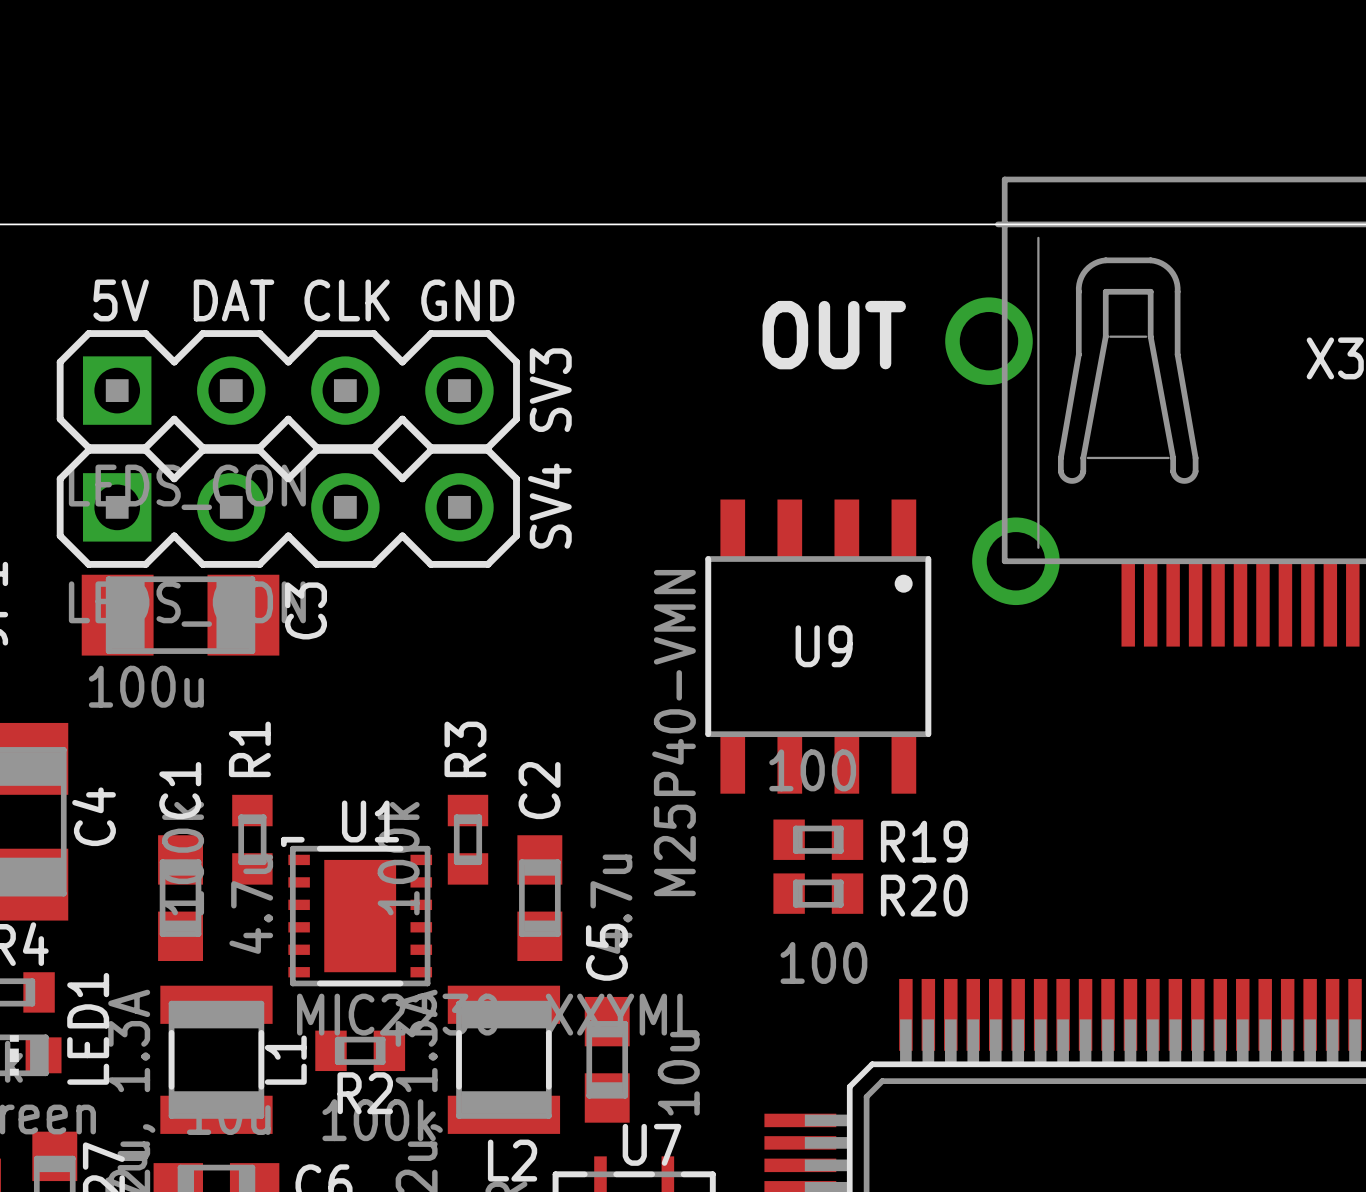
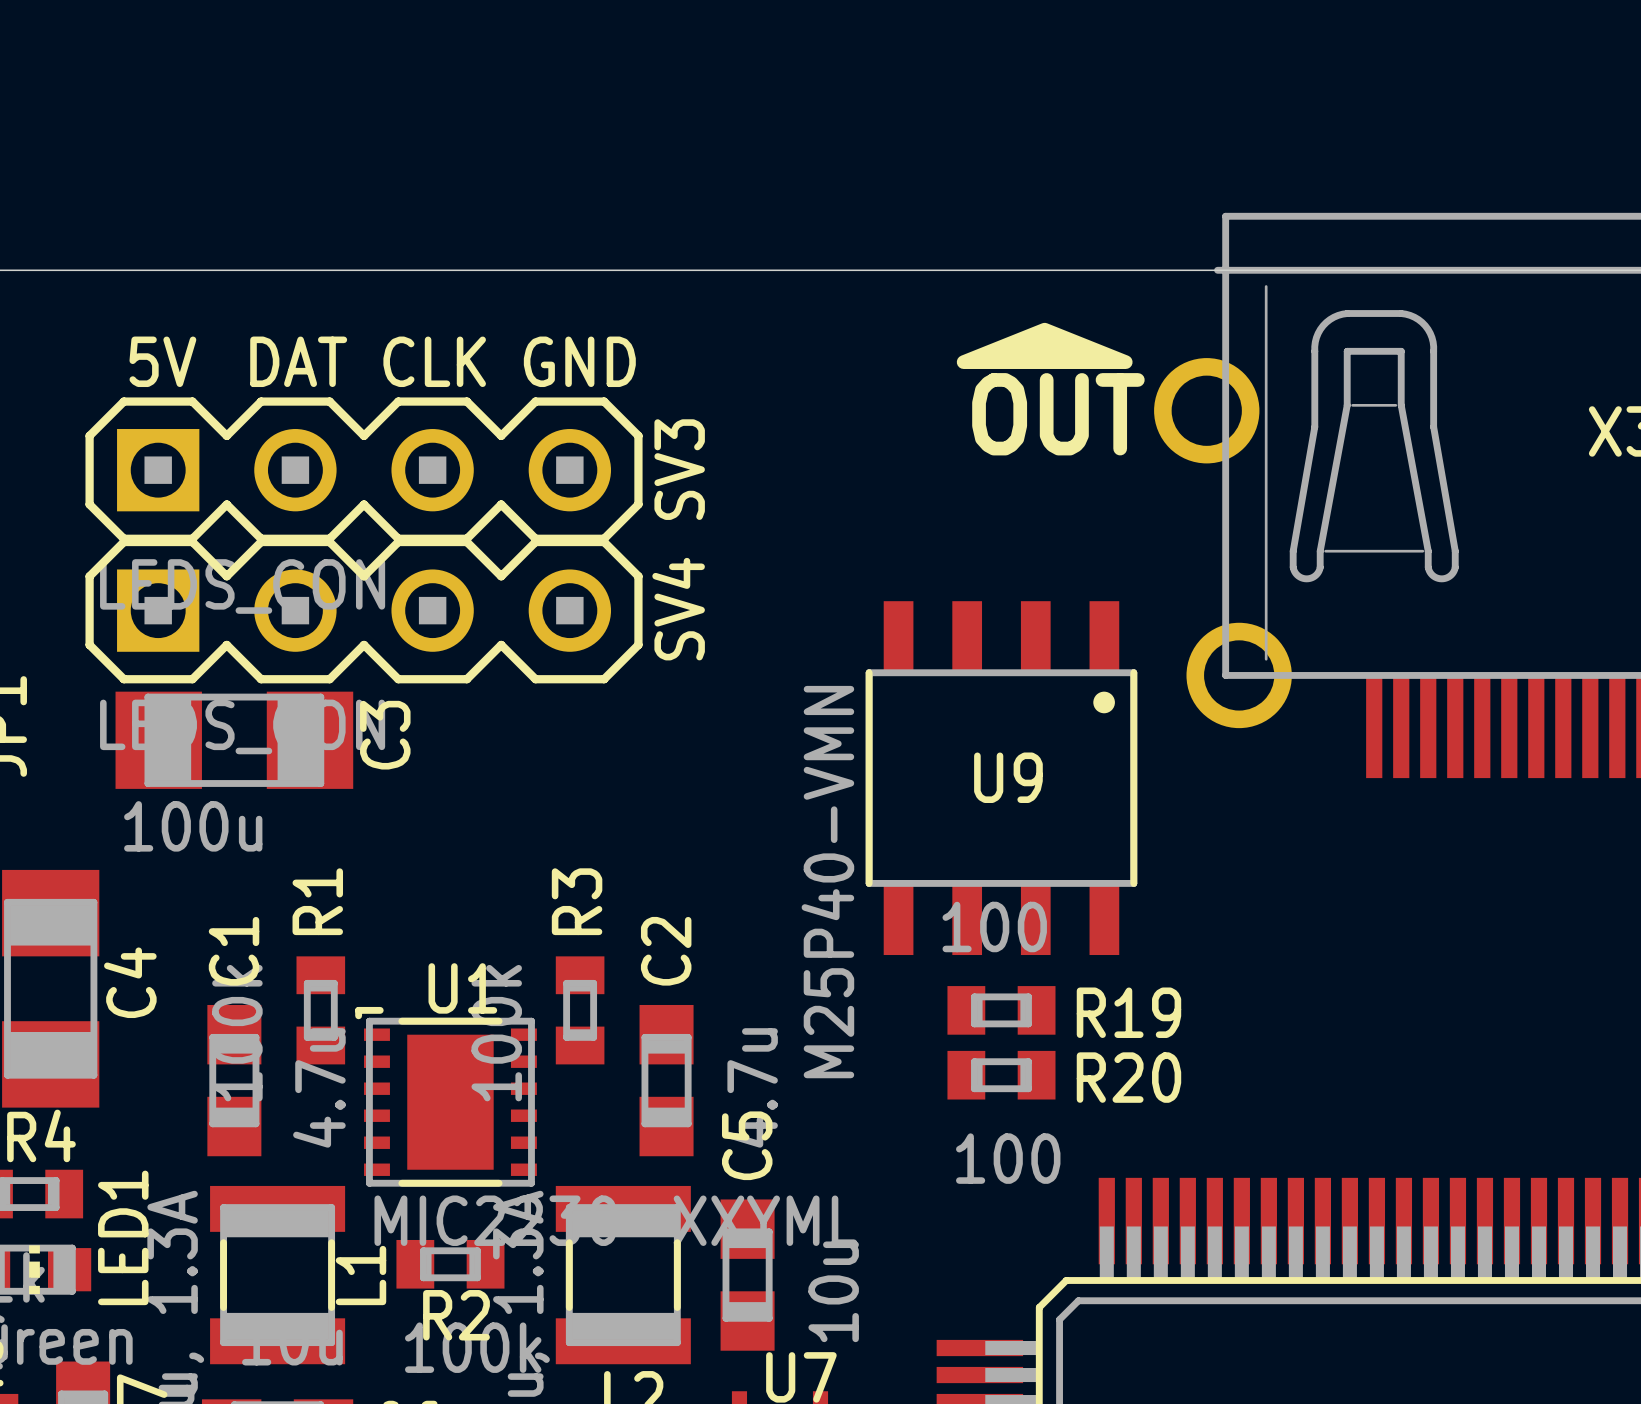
drawing: none -> [956, 322, 1133, 369]
text position: OUT (834, 335) -> OUT (1058, 414)

